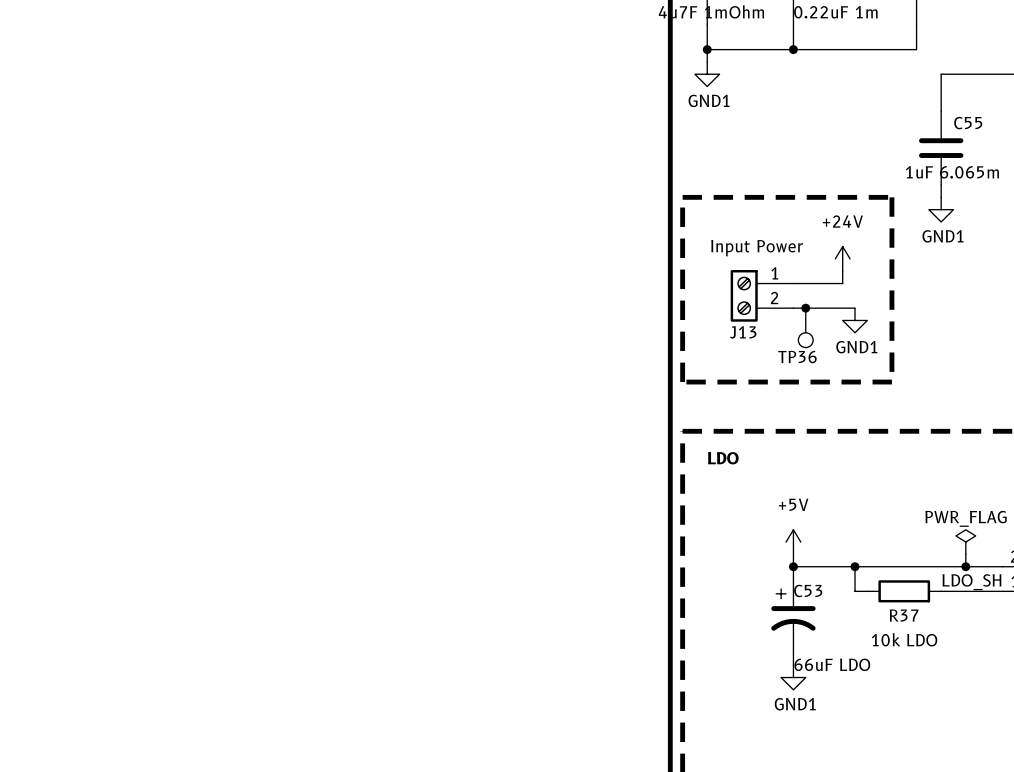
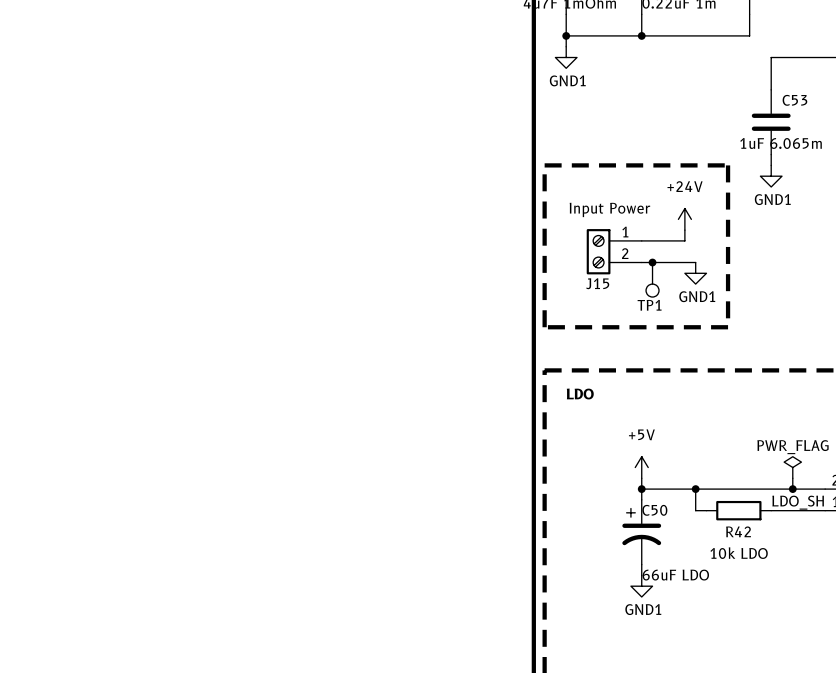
C55 name: C55 (968, 123) -> C53 (794, 100)
J13 name: J13 (743, 332) -> J15 (597, 283)
TP36 name: TP36 (797, 357) -> TP1 (649, 305)
C53 name: C53 (808, 590) -> C50 (654, 510)
R37 name: R37 (904, 615) -> R42 (738, 531)

